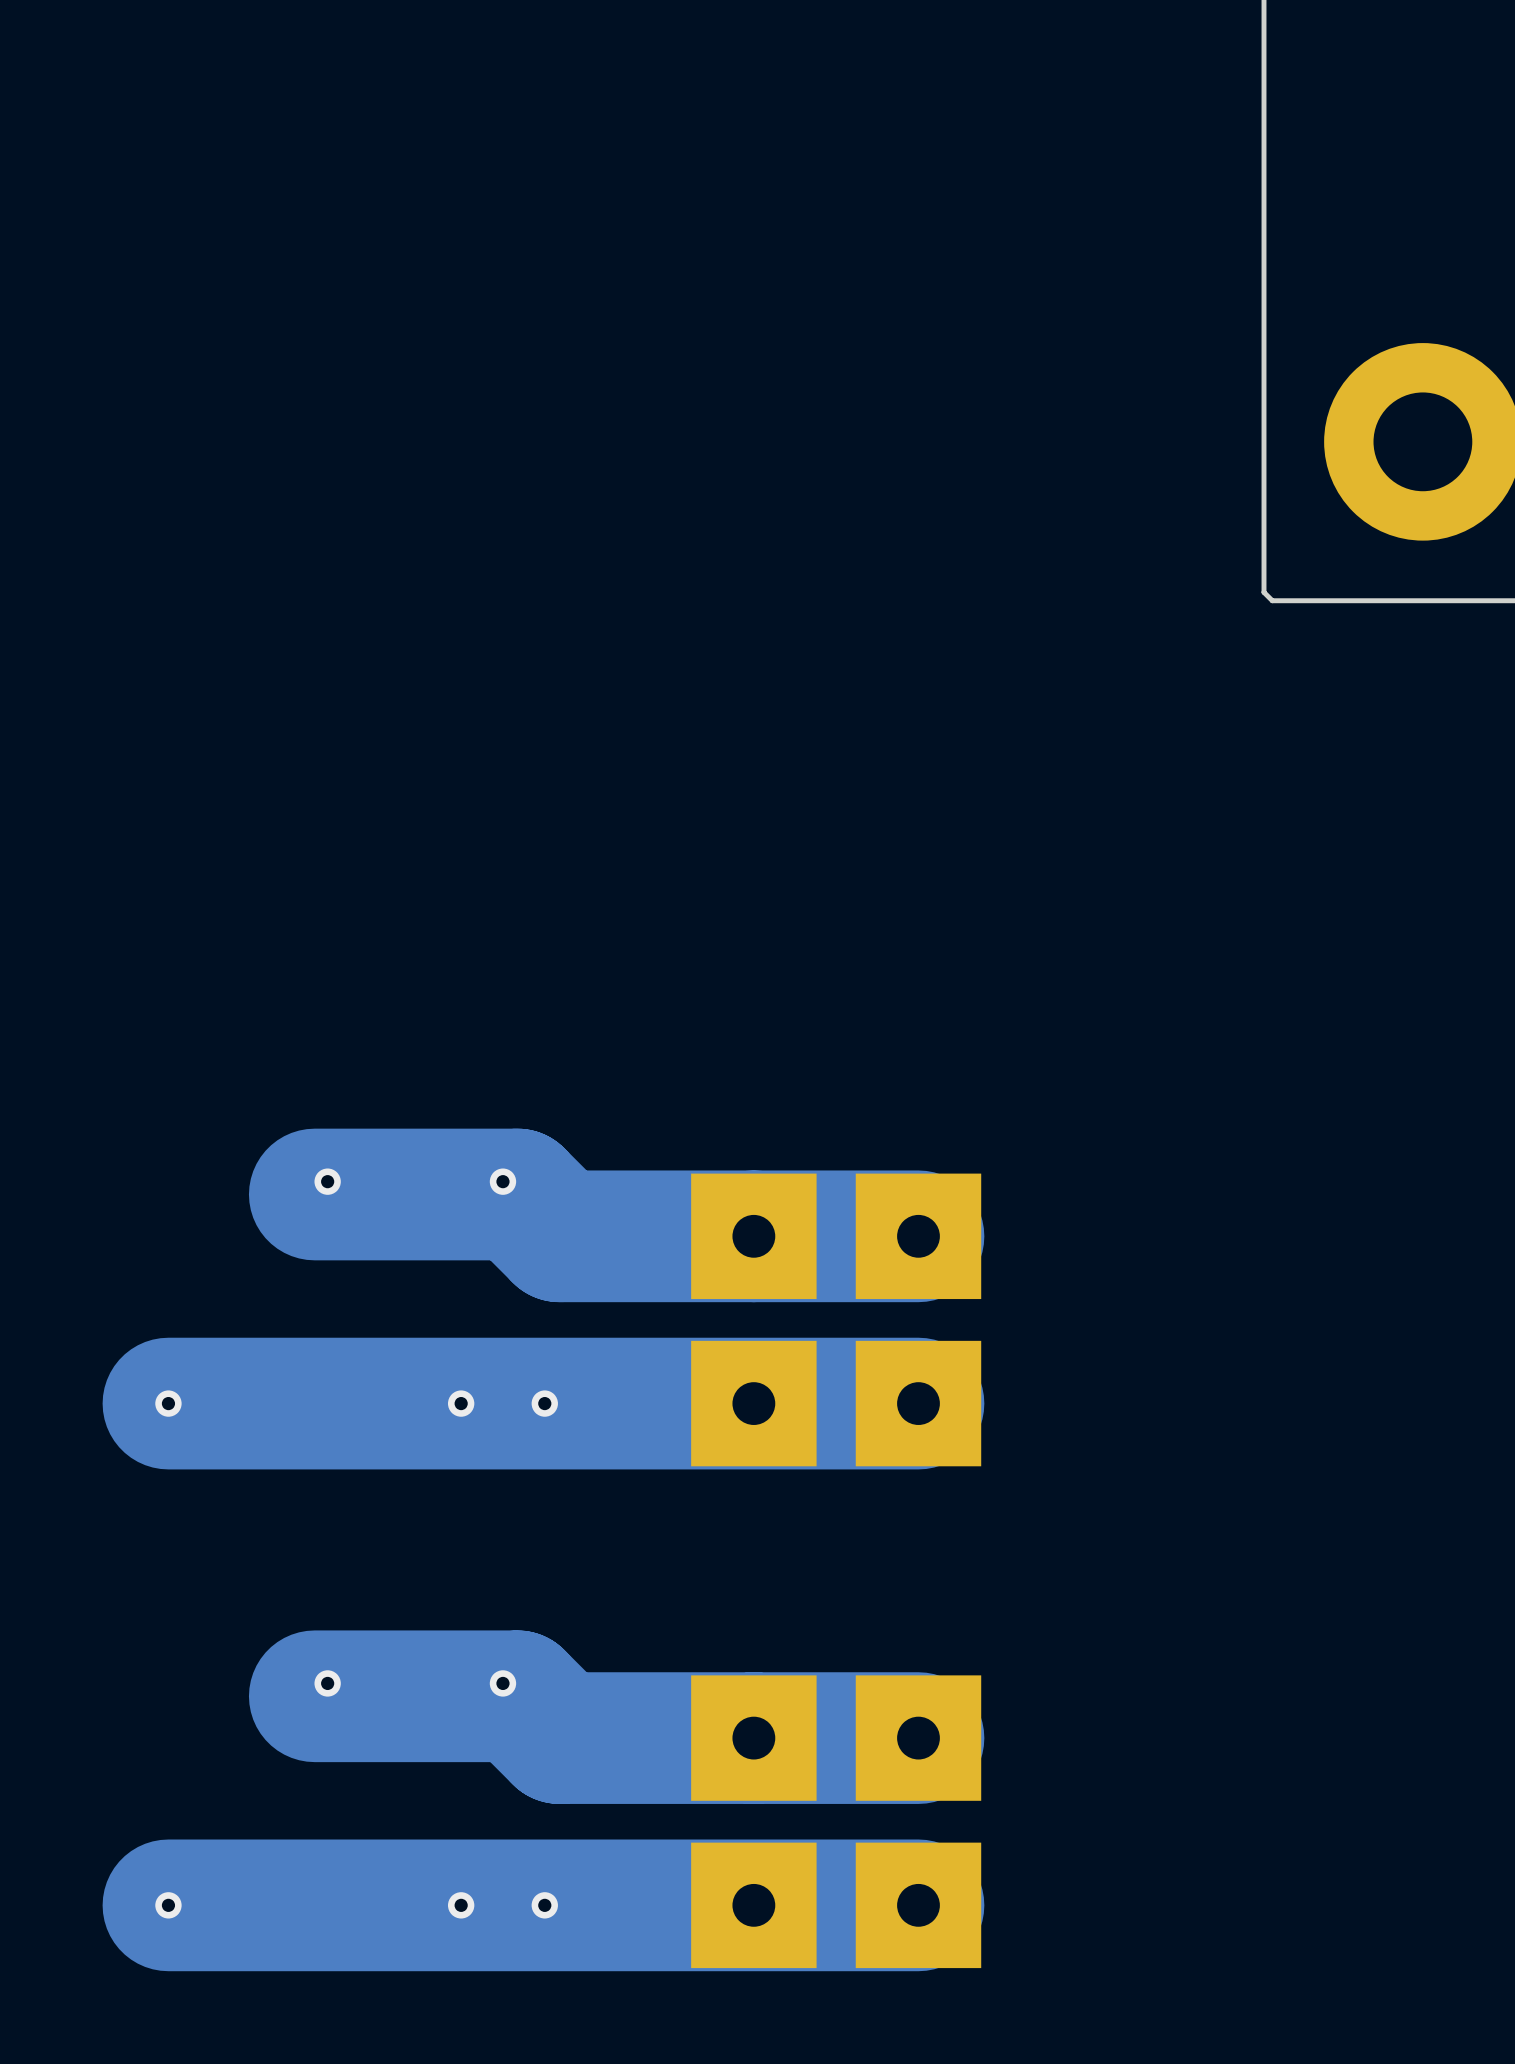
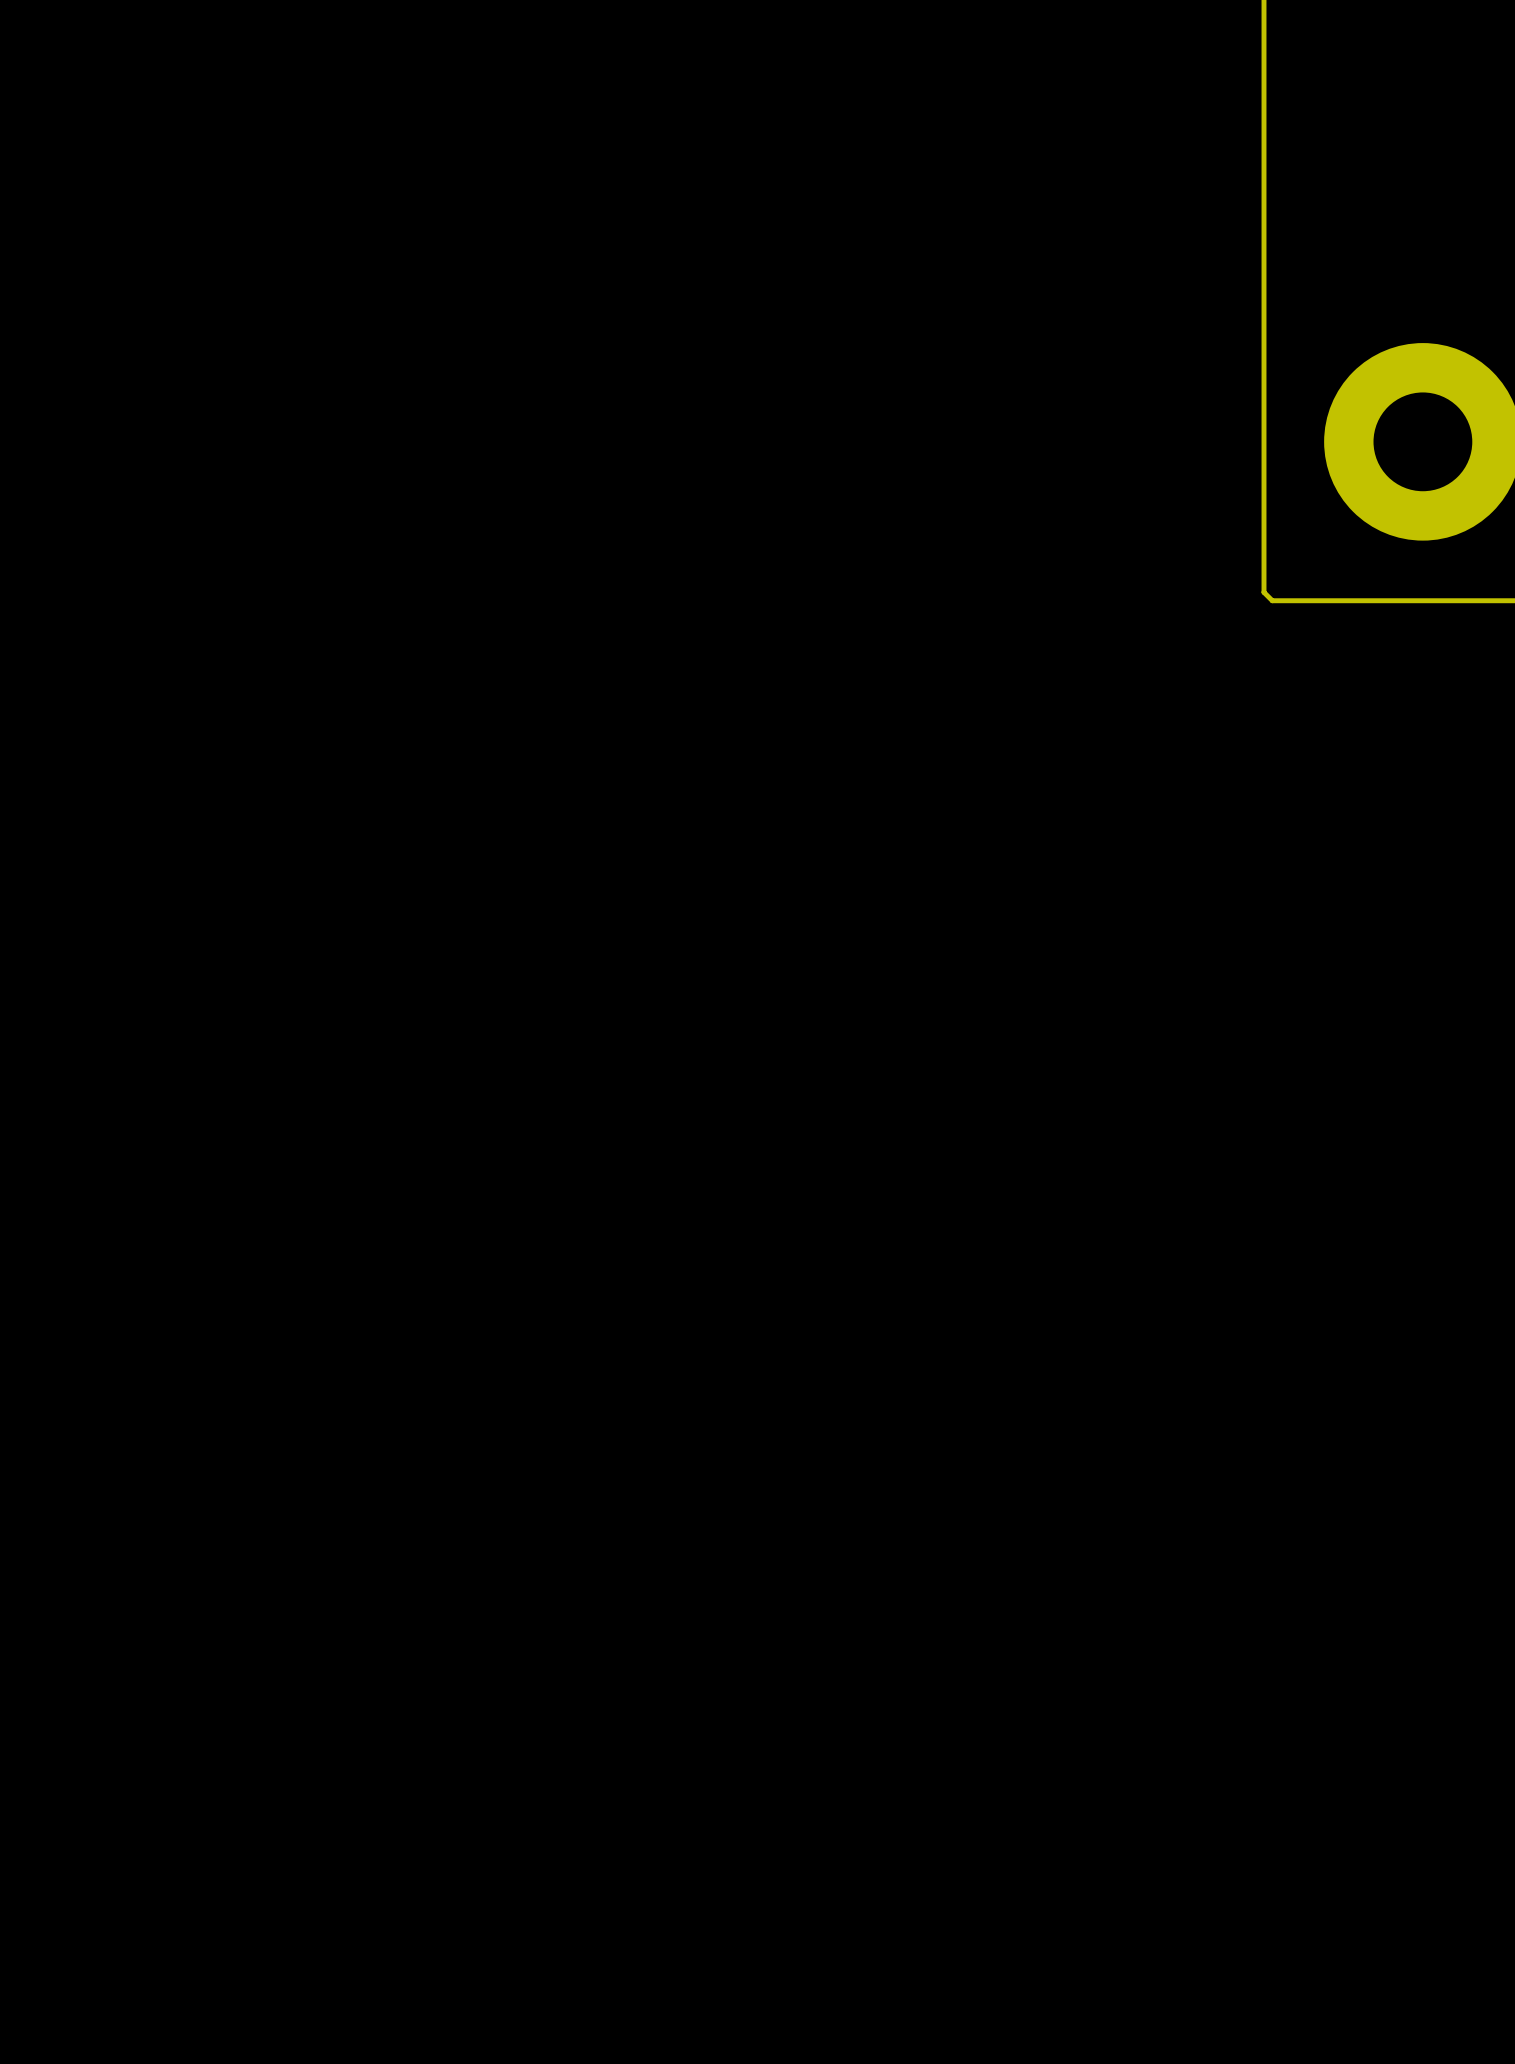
via: (327, 1181) -> none
via: (502, 1181) -> none
track: (314, 1194) (517, 1194) (559, 1236) (918, 1236) -> none
part: (836, 1236) -> none
via: (168, 1403) -> none
via: (461, 1403) -> none
via: (544, 1403) -> none
part: (836, 1403) -> none
track: (918, 1403) (168, 1403) -> none
via: (327, 1683) -> none
via: (502, 1683) -> none
track: (314, 1696) (517, 1696) (559, 1738) (918, 1738) -> none
part: (836, 1738) -> none
via: (168, 1905) -> none
via: (461, 1905) -> none
via: (544, 1905) -> none
part: (836, 1905) -> none
track: (918, 1905) (168, 1905) -> none

